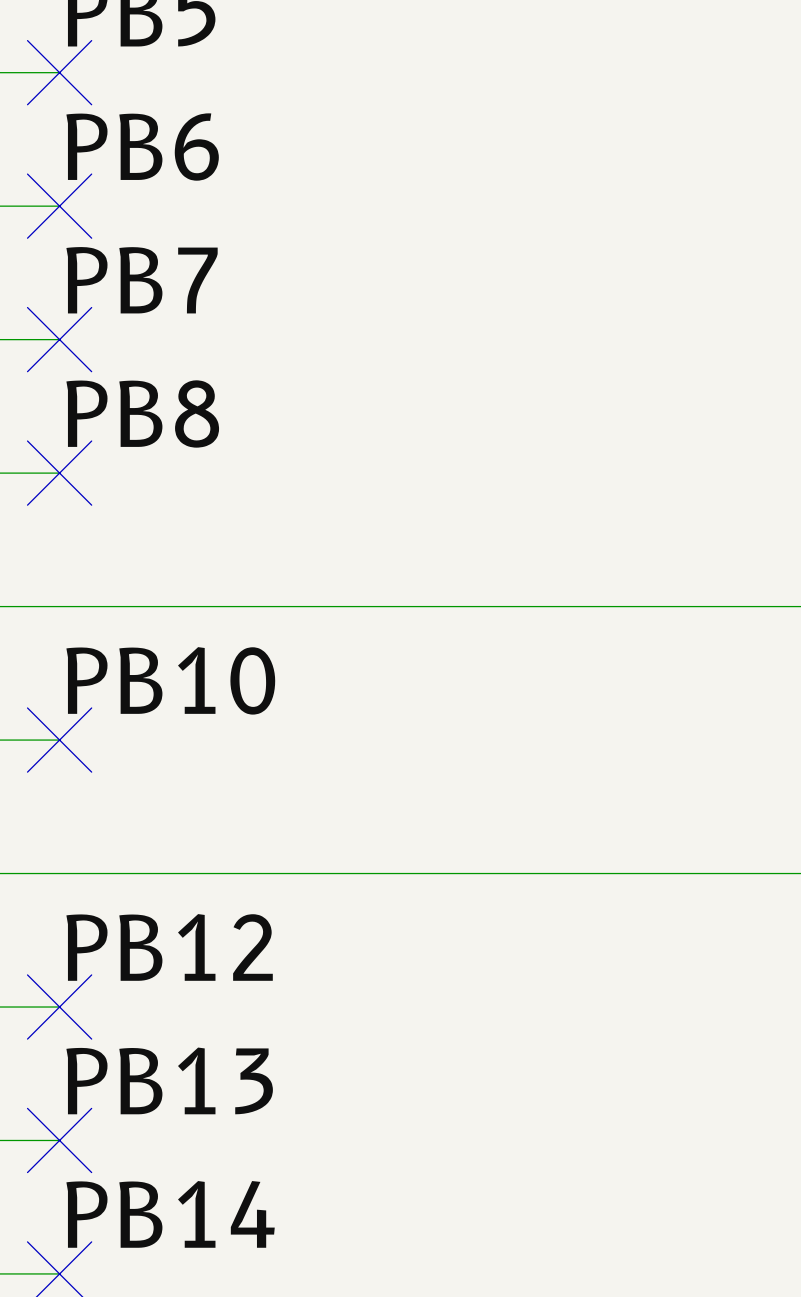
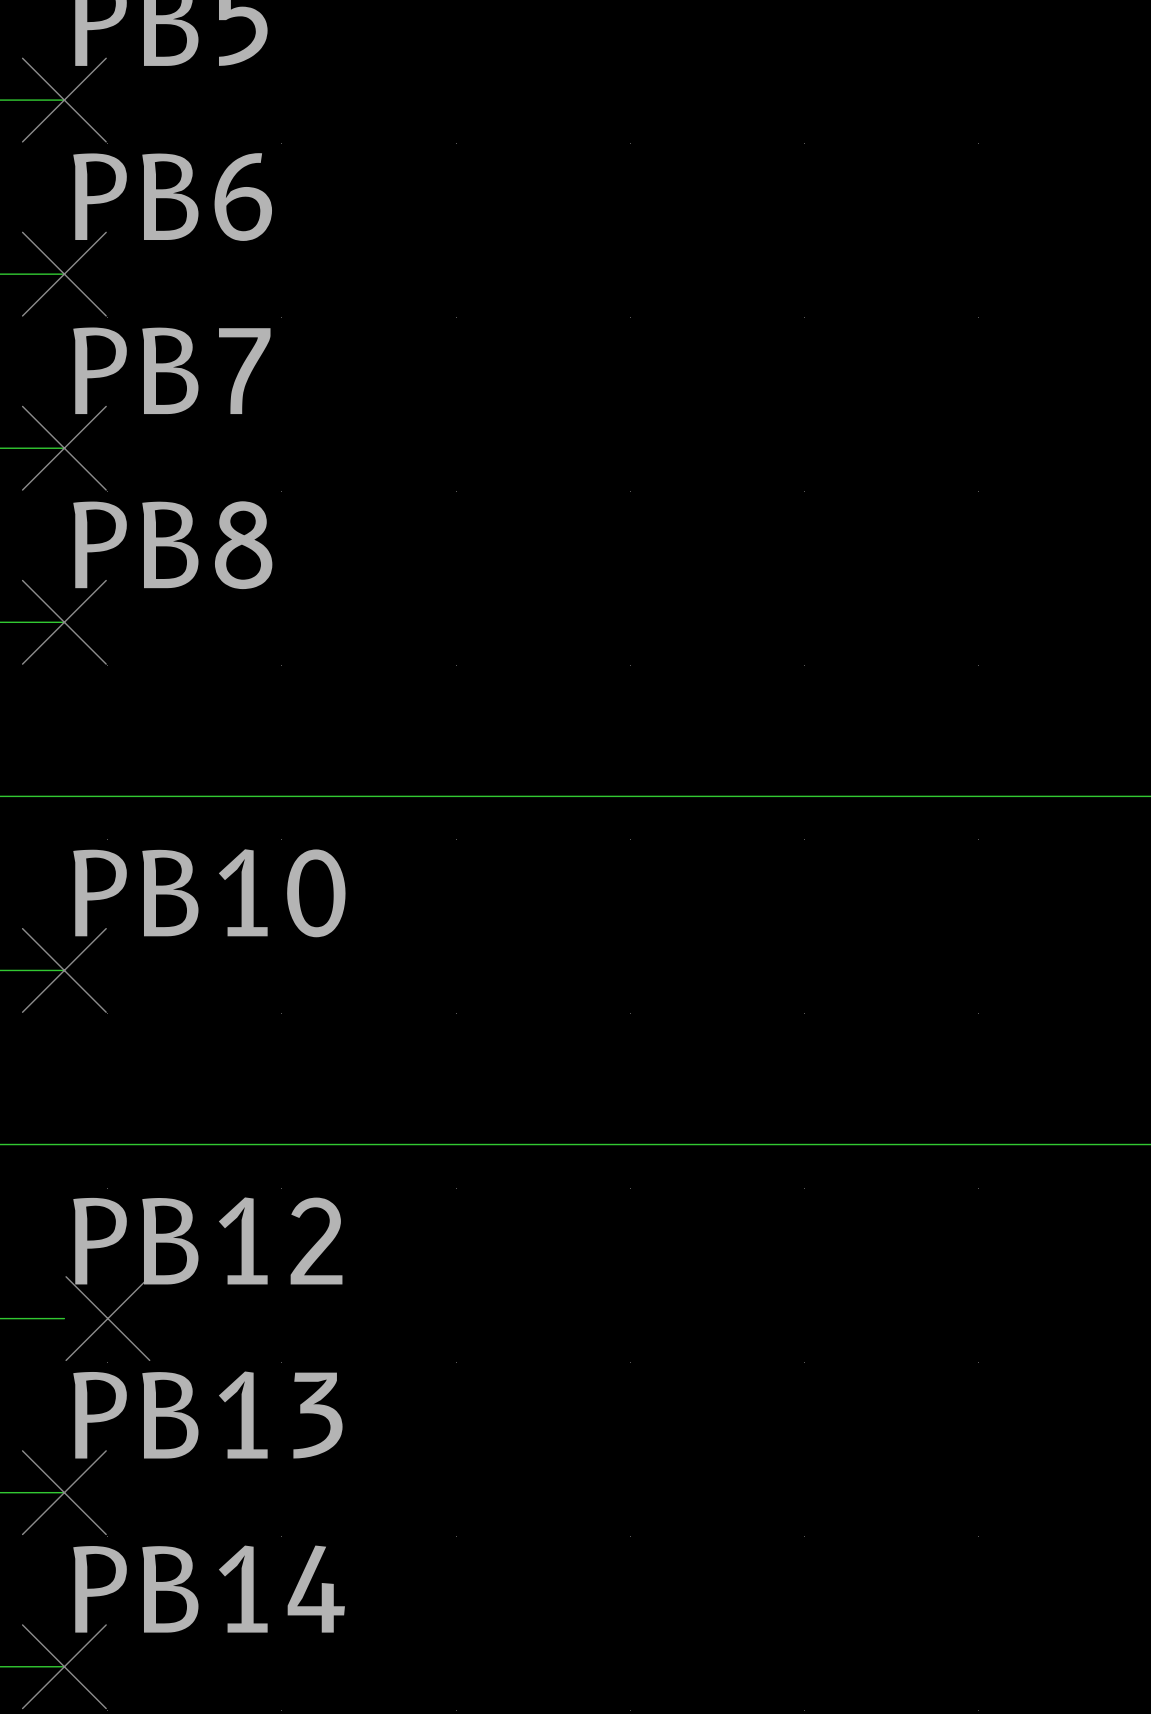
no-connect mark position: (59, 1007) -> (107, 1318)

